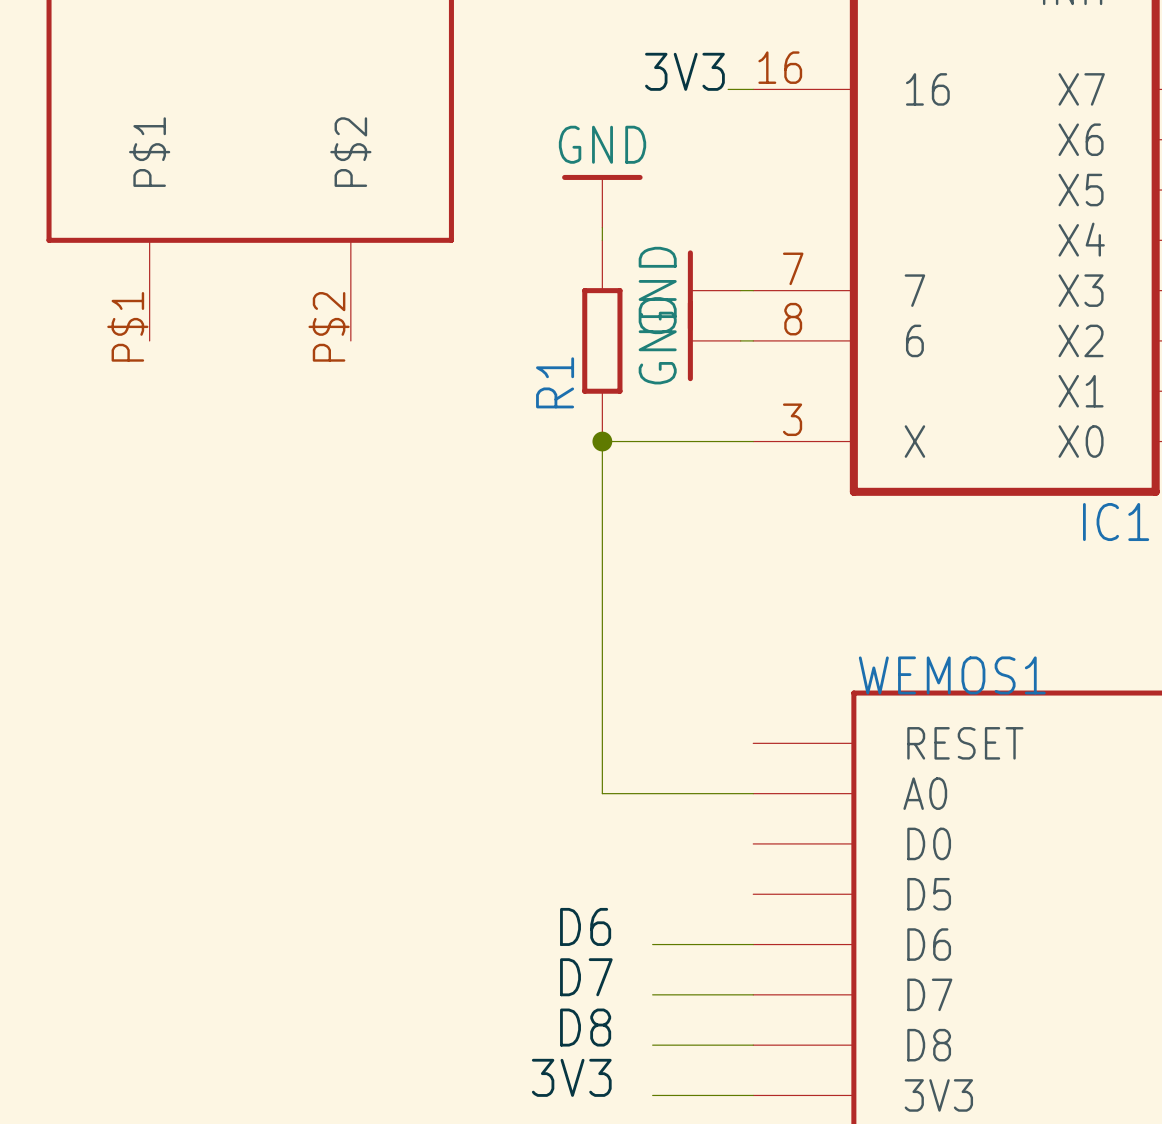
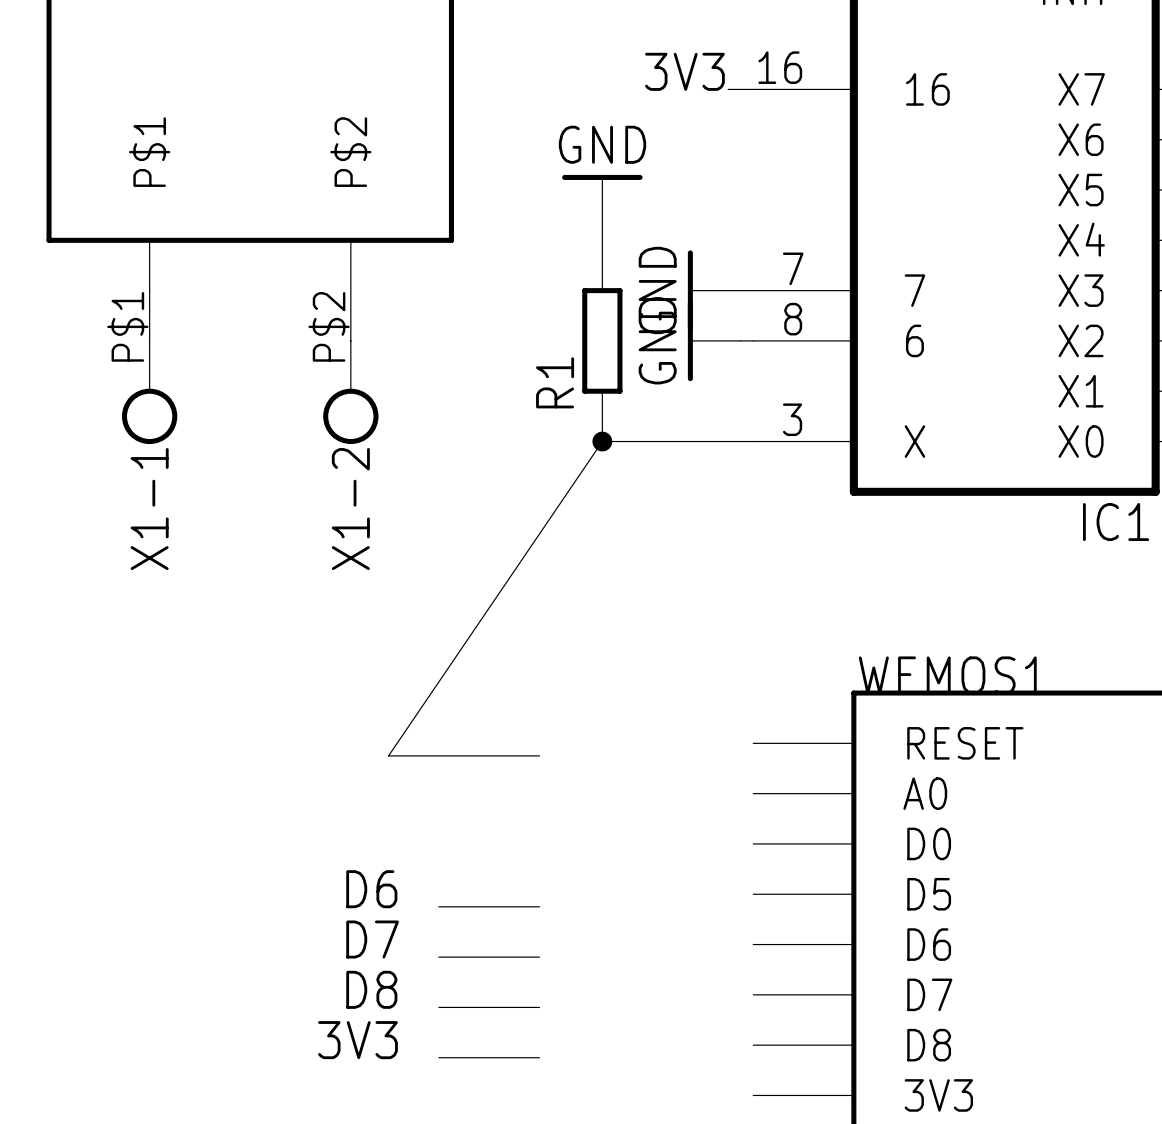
X1-1: none -> (149, 392)
X1-2: none -> (350, 392)
wire: (602, 441) (602, 793) (753, 793) -> (602, 441) (388, 755) (539, 755)
label position: D6 (585, 926) -> D6 (371, 889)
wire: (652, 944) (753, 944) -> (438, 906) (539, 906)
label position: D7 (586, 977) -> D7 (372, 939)
wire: (652, 994) (753, 994) -> (438, 957) (539, 957)
label position: D8 (585, 1027) -> D8 (371, 989)
wire: (652, 1045) (753, 1045) -> (438, 1007) (539, 1007)
label position: 3V3 (571, 1077) -> 3V3 (357, 1040)
wire: (652, 1095) (753, 1095) -> (438, 1057) (539, 1057)

